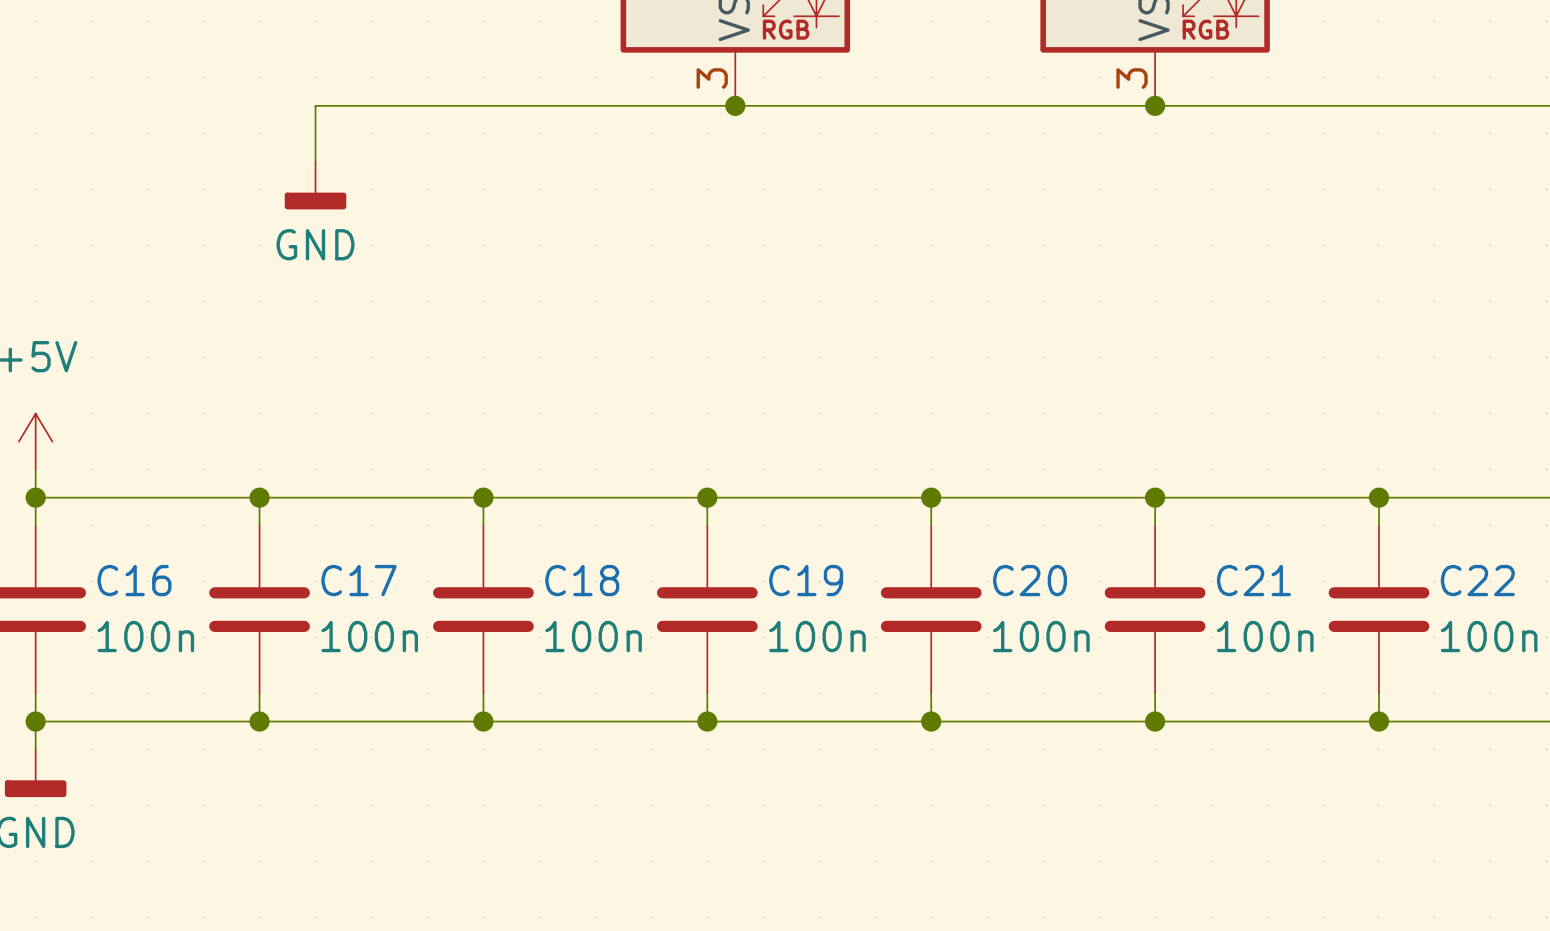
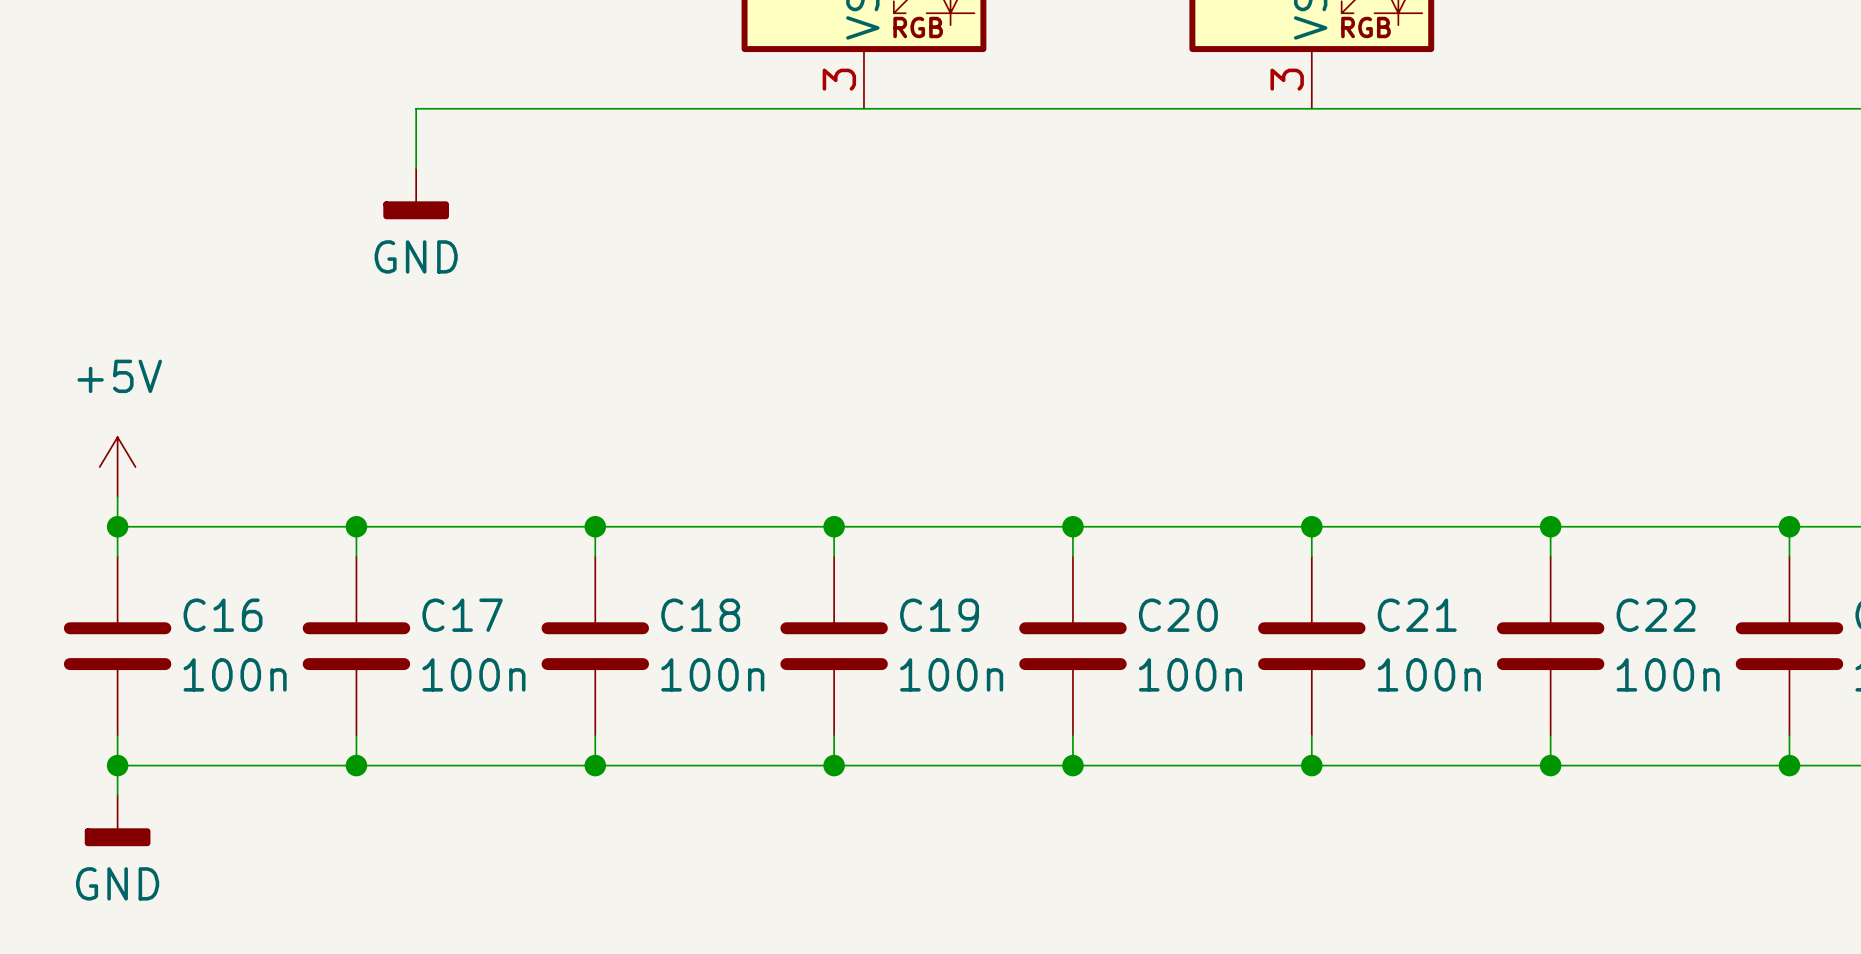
junction: (735, 105) -> none
junction: (1155, 105) -> none

